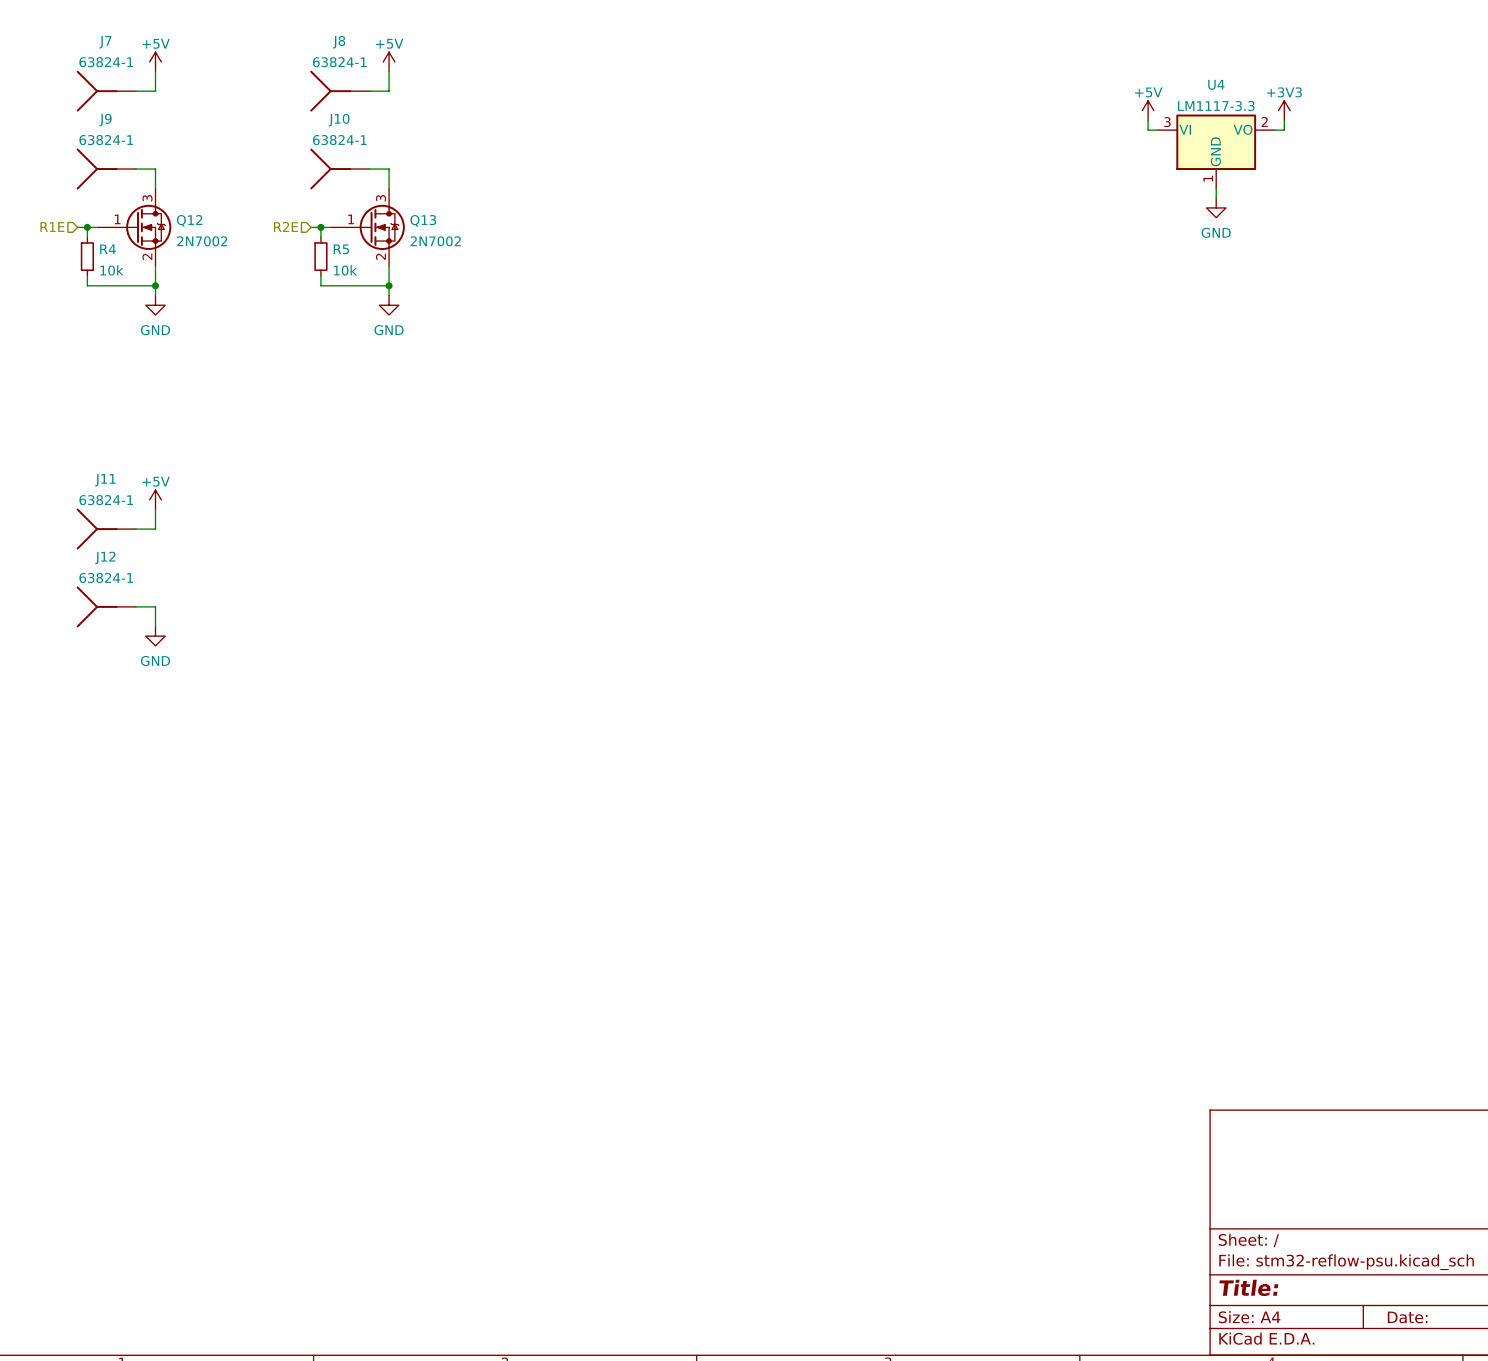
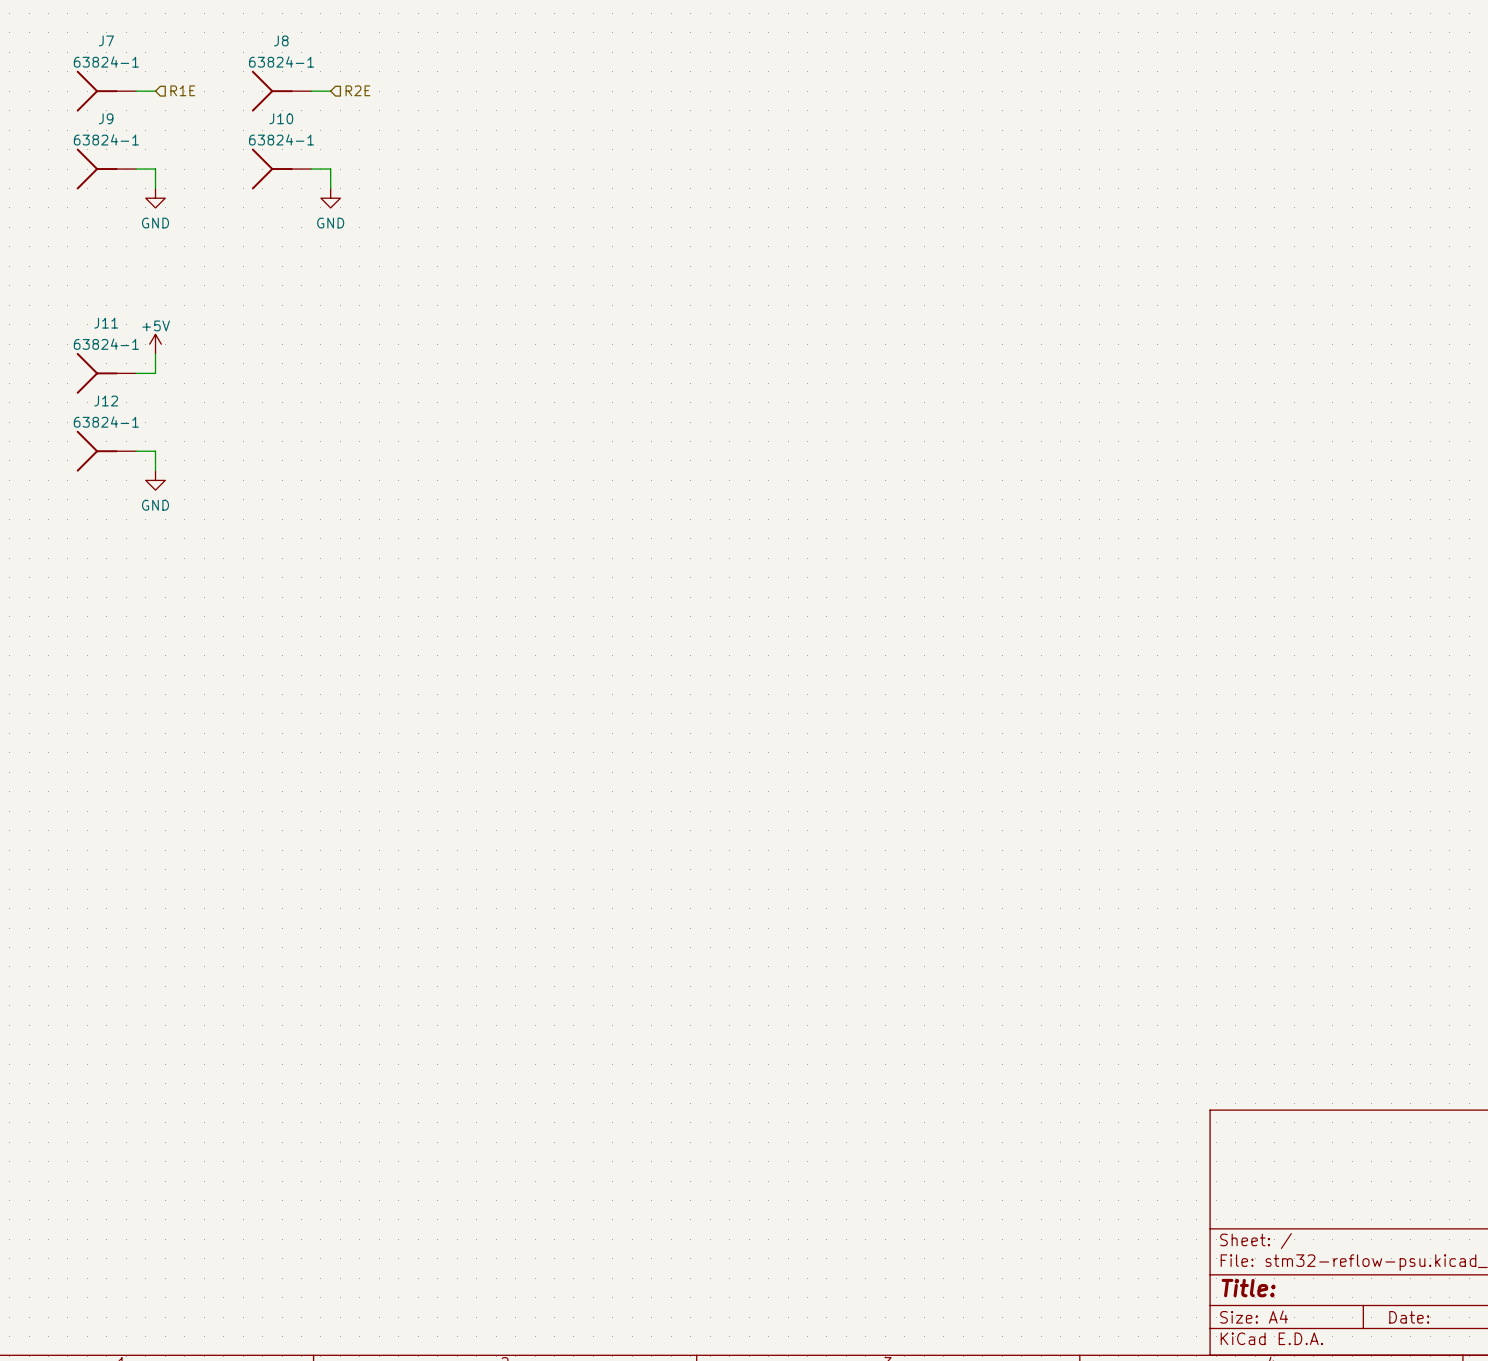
power symbol: +5V (155, 61) -> none
power symbol: +5V (389, 61) -> none
wire: (155, 71) (155, 91) -> none
wire: (389, 71) (389, 91) (369, 91) -> none
J8 position: (339, 91) -> (281, 91)
power symbol: +5V (1148, 110) -> none
power symbol: +3V3 (1284, 110) -> none
wire: (1148, 120) (1148, 130) (1157, 130) -> none
wire: (1284, 120) (1284, 130) (1274, 130) -> none
U4: LM1117-3.3 (1216, 151) -> none
J10 position: (339, 169) -> (281, 169)
wire: (369, 169) (389, 169) (389, 188) -> (311, 169) (330, 169) (330, 188)
wire: (1216, 188) (1216, 198) -> none
power symbol: none -> GND (155, 198)
power symbol: none -> GND (330, 198)
power symbol: GND (1216, 207) -> none
hierarchical label rotation: 0° (285, 226) -> 180° (357, 90)
hierarchical label position: R2E (285, 226) -> R2E (357, 90)
hierarchical label rotation: 0° (52, 227) -> 180° (182, 90)
hierarchical label position: R1E (52, 227) -> R1E (182, 90)
wire: (77, 227) (97, 227) -> none
wire: (87, 227) (87, 237) -> none
junction: (87, 227) -> none
Q12: 2N7002 (134, 227) -> none
wire: (311, 227) (330, 227) -> (311, 91) (330, 91)
wire: (320, 227) (320, 237) -> none
junction: (320, 227) -> none
Q13: 2N7002 (367, 227) -> none
R4: 10k (87, 256) -> none
R5: 10k (320, 256) -> none
wire: (155, 266) (155, 295) -> none
wire: (389, 266) (389, 295) -> none
wire: (87, 276) (87, 285) (155, 285) -> none
wire: (320, 276) (320, 285) (389, 285) -> none
junction: (155, 285) -> none
junction: (389, 285) -> none
power symbol: GND (155, 305) -> none
power symbol: GND (389, 305) -> none
power symbol: none -> +5V (155, 344)
power symbol: none -> GND (155, 480)
power symbol: +5V (155, 499) -> none
wire: (155, 509) (155, 529) (136, 529) -> (155, 353) (155, 373) (136, 373)
J11 position: (106, 529) -> (106, 373)
J12 position: (106, 606) -> (106, 451)
wire: (136, 606) (155, 606) (155, 626) -> (136, 451) (155, 451) (155, 470)
power symbol: GND (155, 636) -> none

